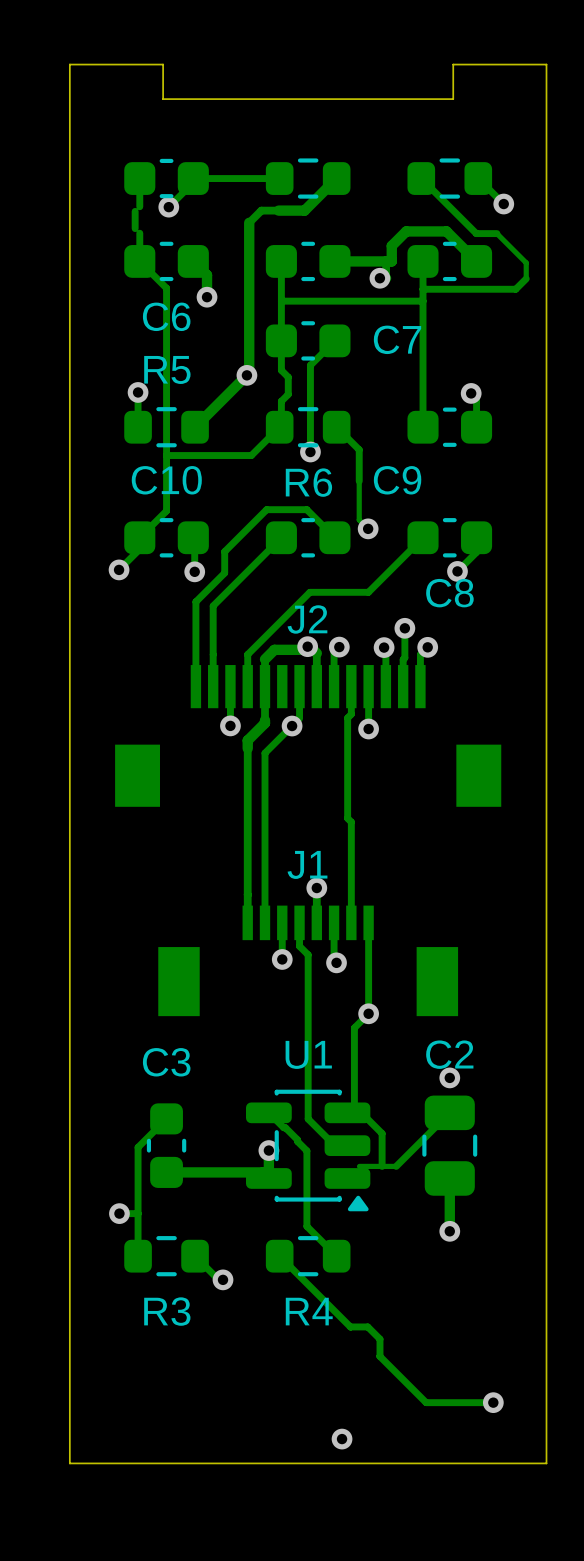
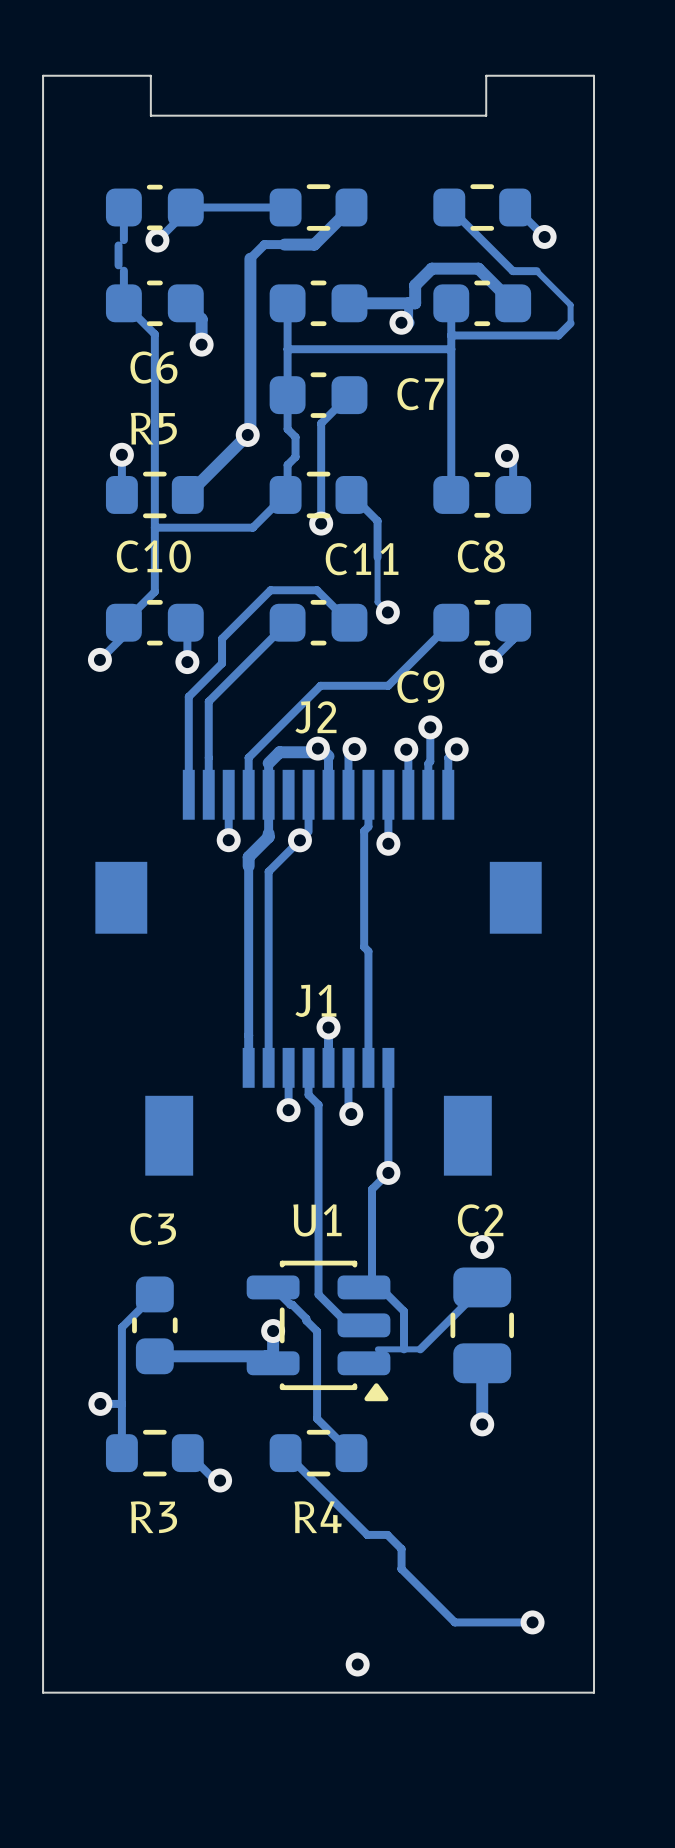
C9 name position: C9 (397, 480) -> C9 (420, 686)
R6 name: R6 (308, 482) -> none
C11 name: none -> C11 (362, 559)
C8 name position: C8 (449, 593) -> C8 (481, 556)

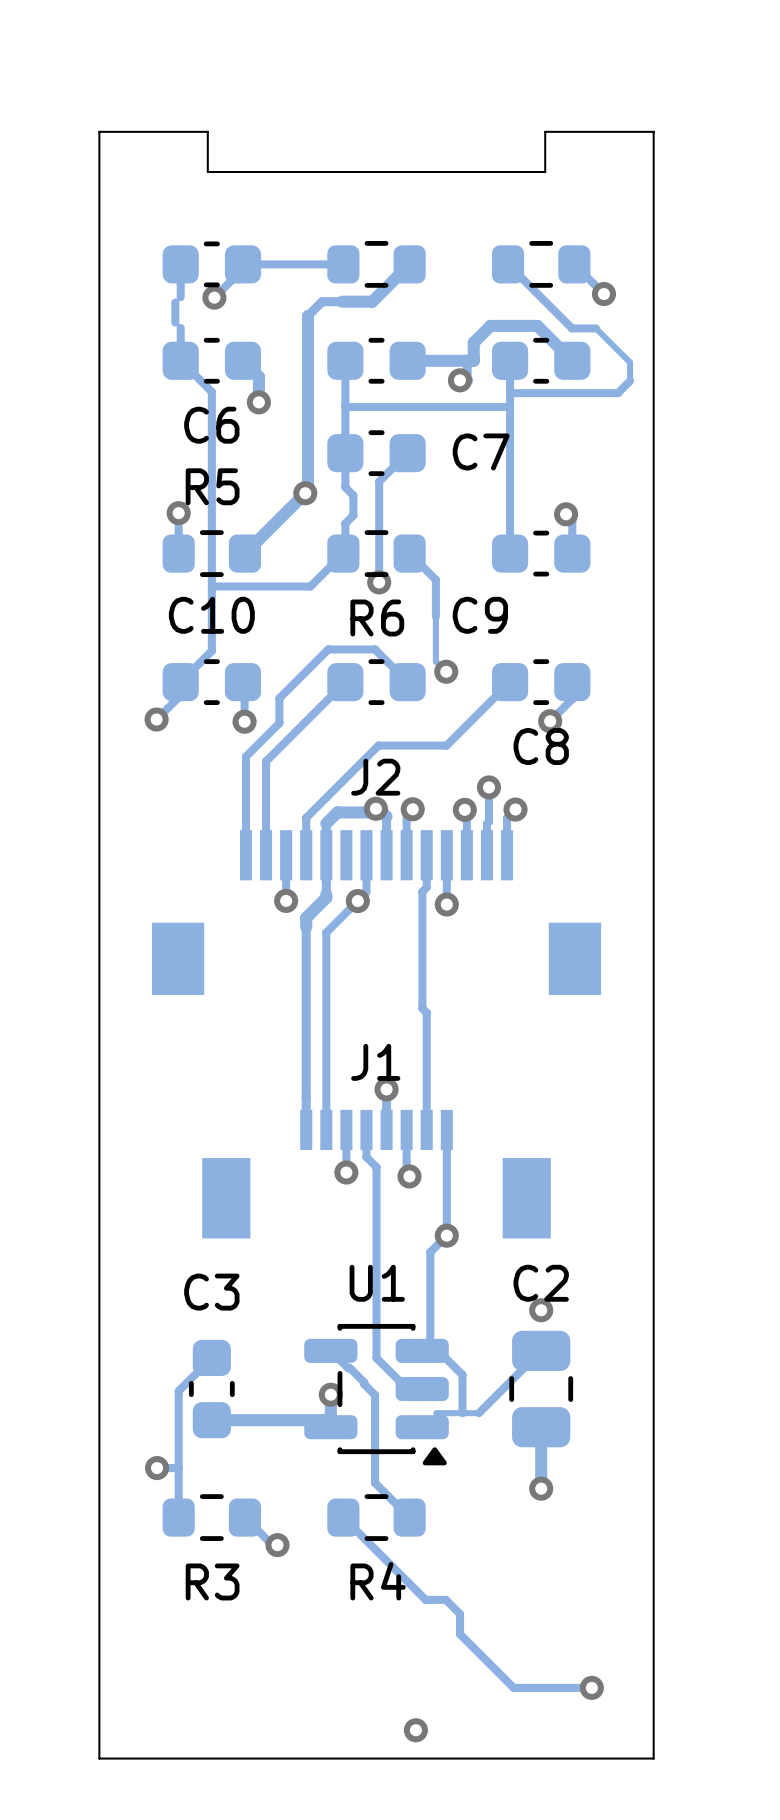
C8 name position: C8 (481, 556) -> C8 (541, 746)
R6 name: none -> R6 (377, 617)
C11 name: C11 (362, 559) -> none
C9 name position: C9 (420, 686) -> C9 (480, 615)

